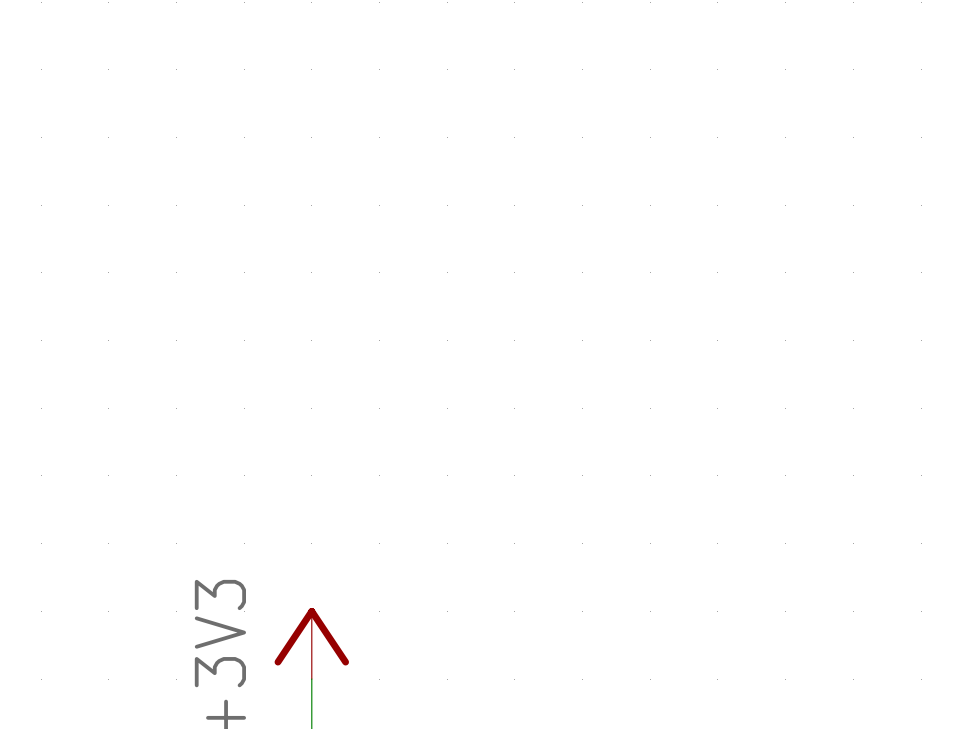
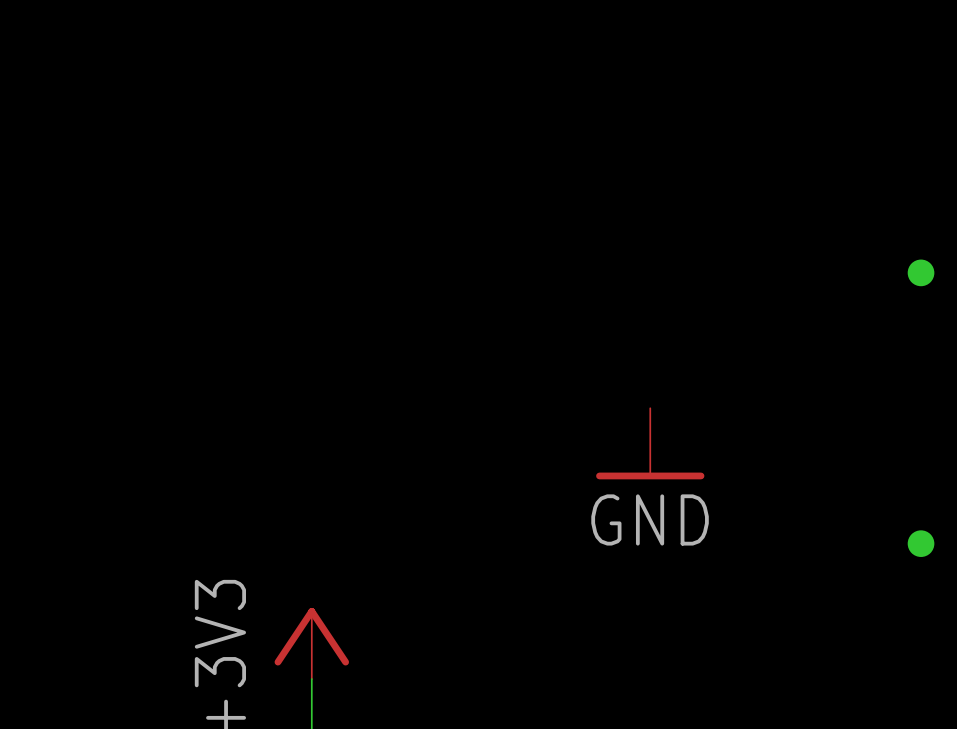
junction: none -> (921, 272)
power symbol: none -> GND (650, 443)
junction: none -> (921, 543)

